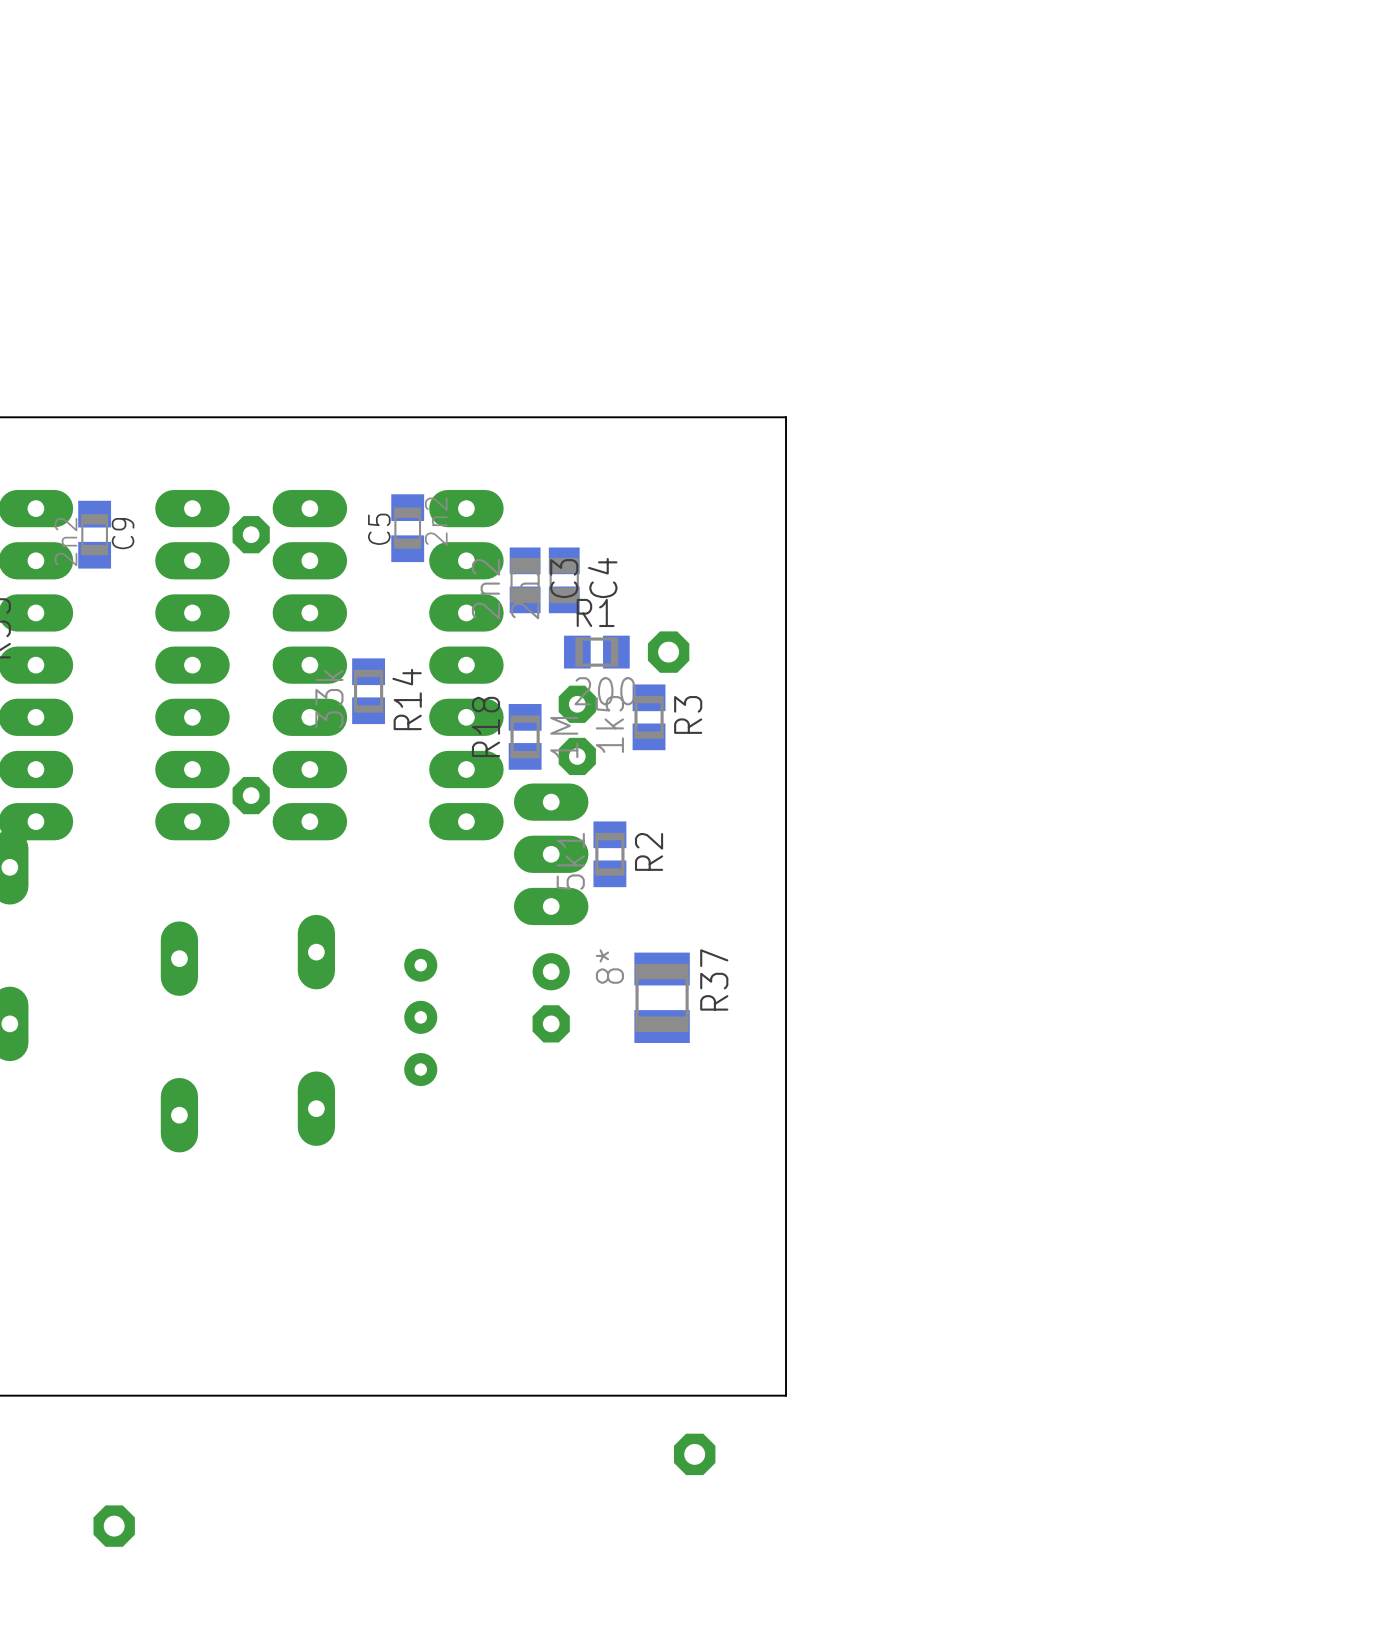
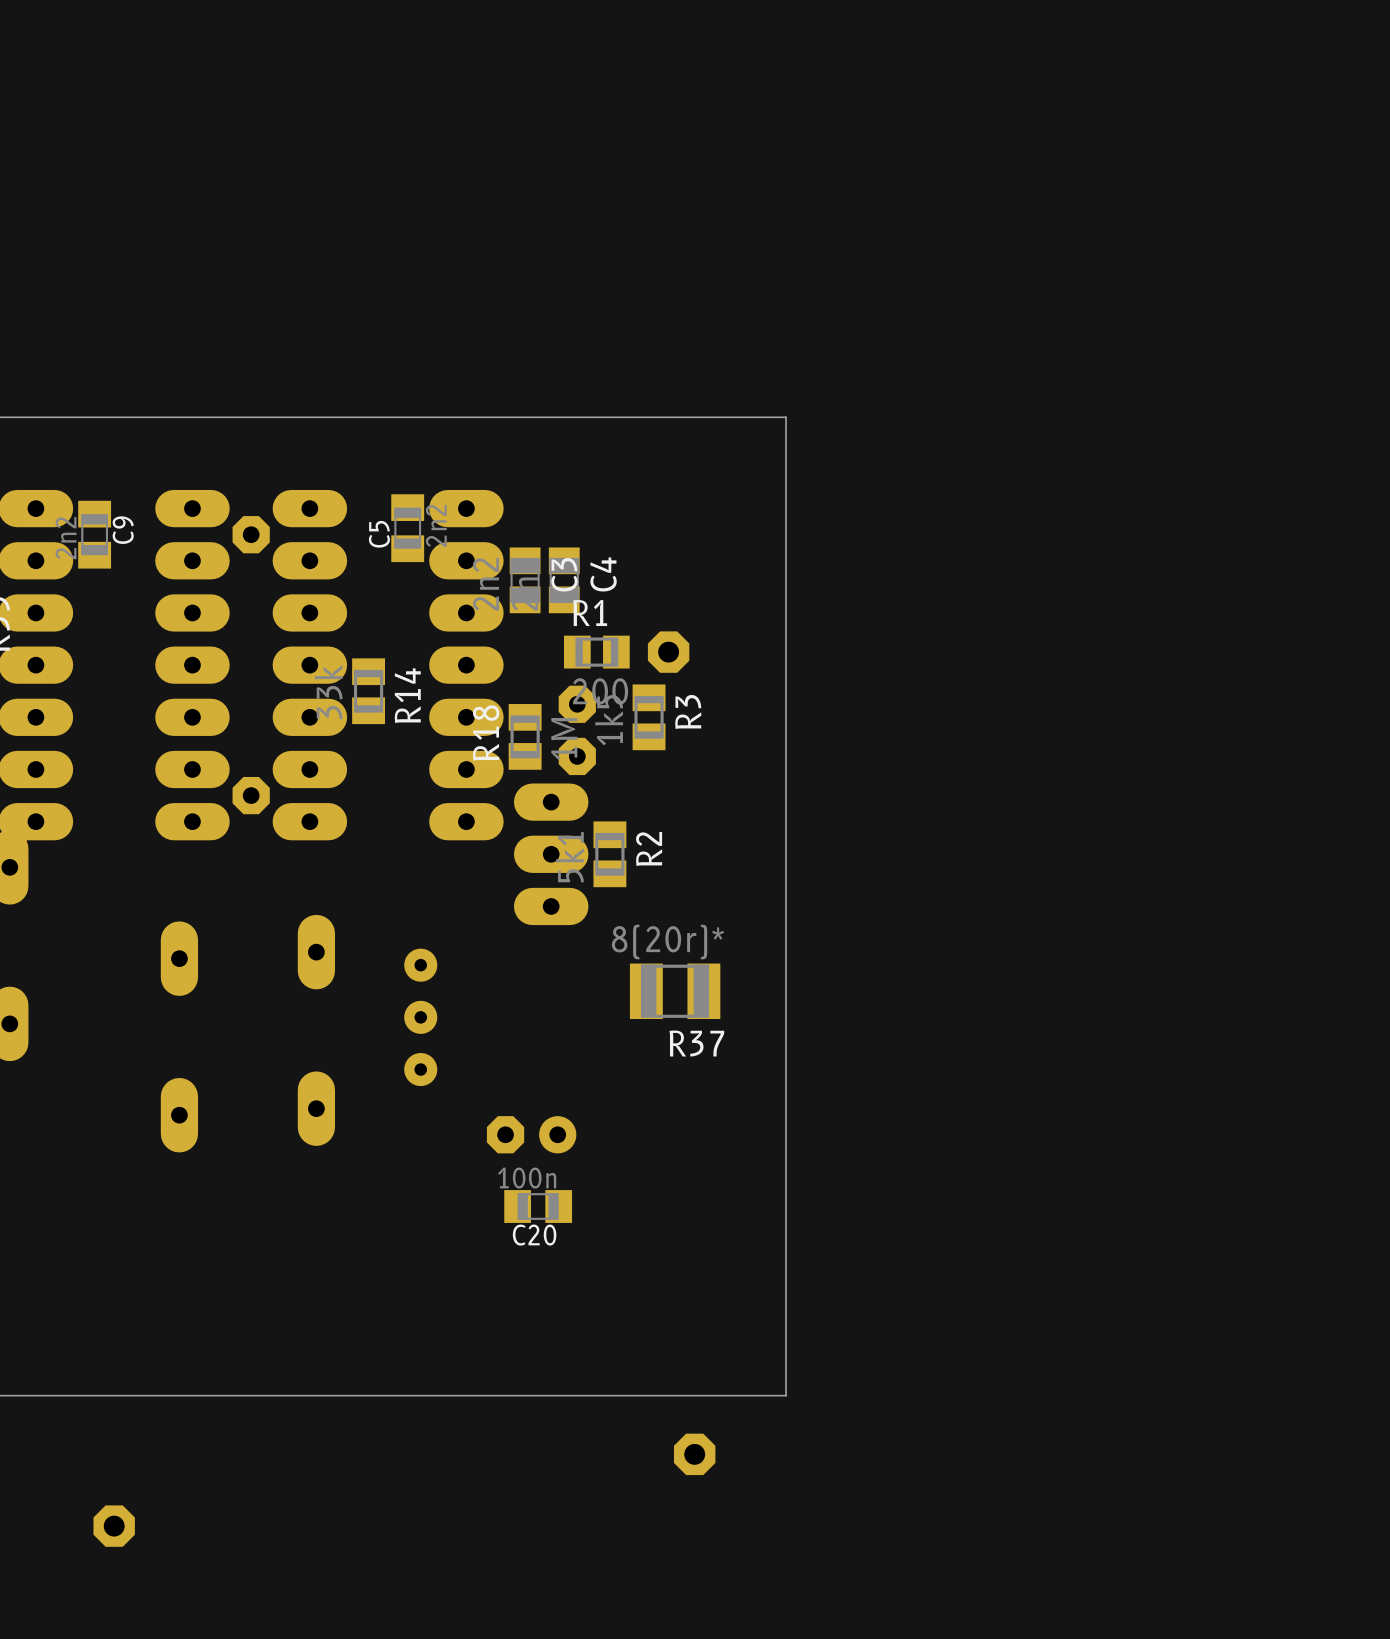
R37 value: 8* (609, 966) -> 8(20r)* (667, 942)
part rotation: 0° (551, 997) -> 90° clockwise (531, 1134)
part position: (551, 997) -> (531, 1134)
R37 rotation: 0° (662, 997) -> 90° clockwise (675, 991)
C20: none -> 100n (538, 1206)

